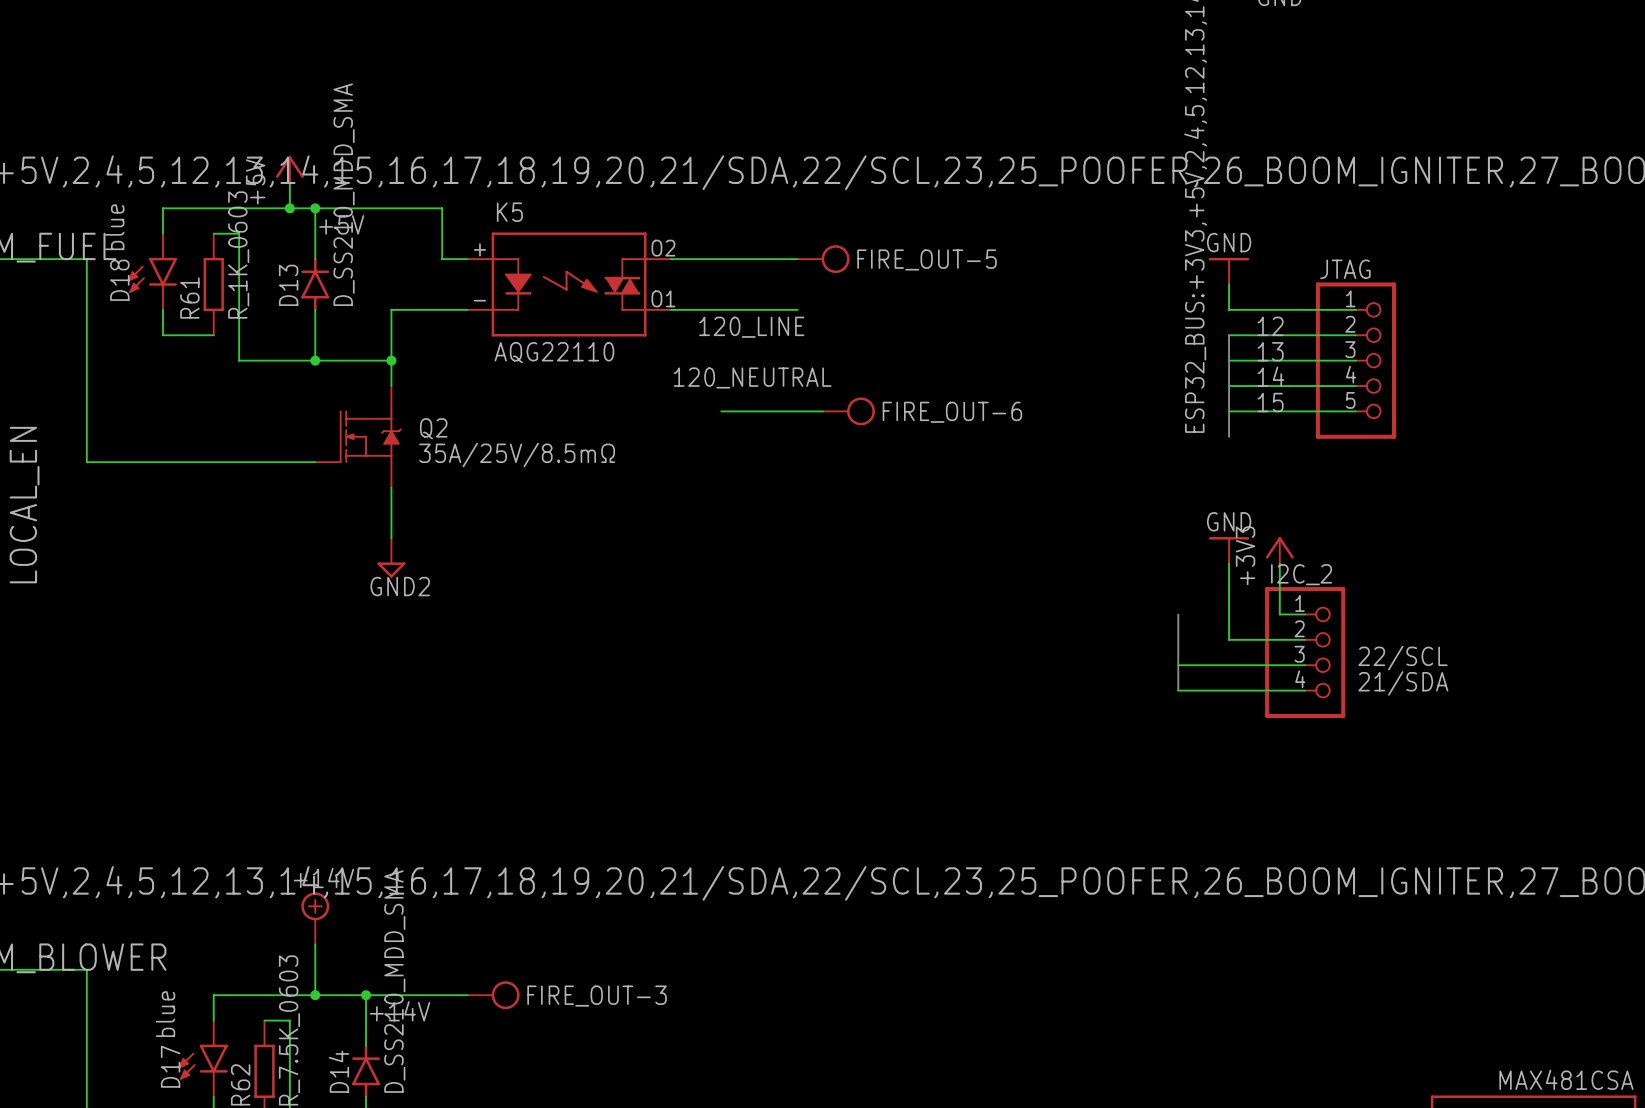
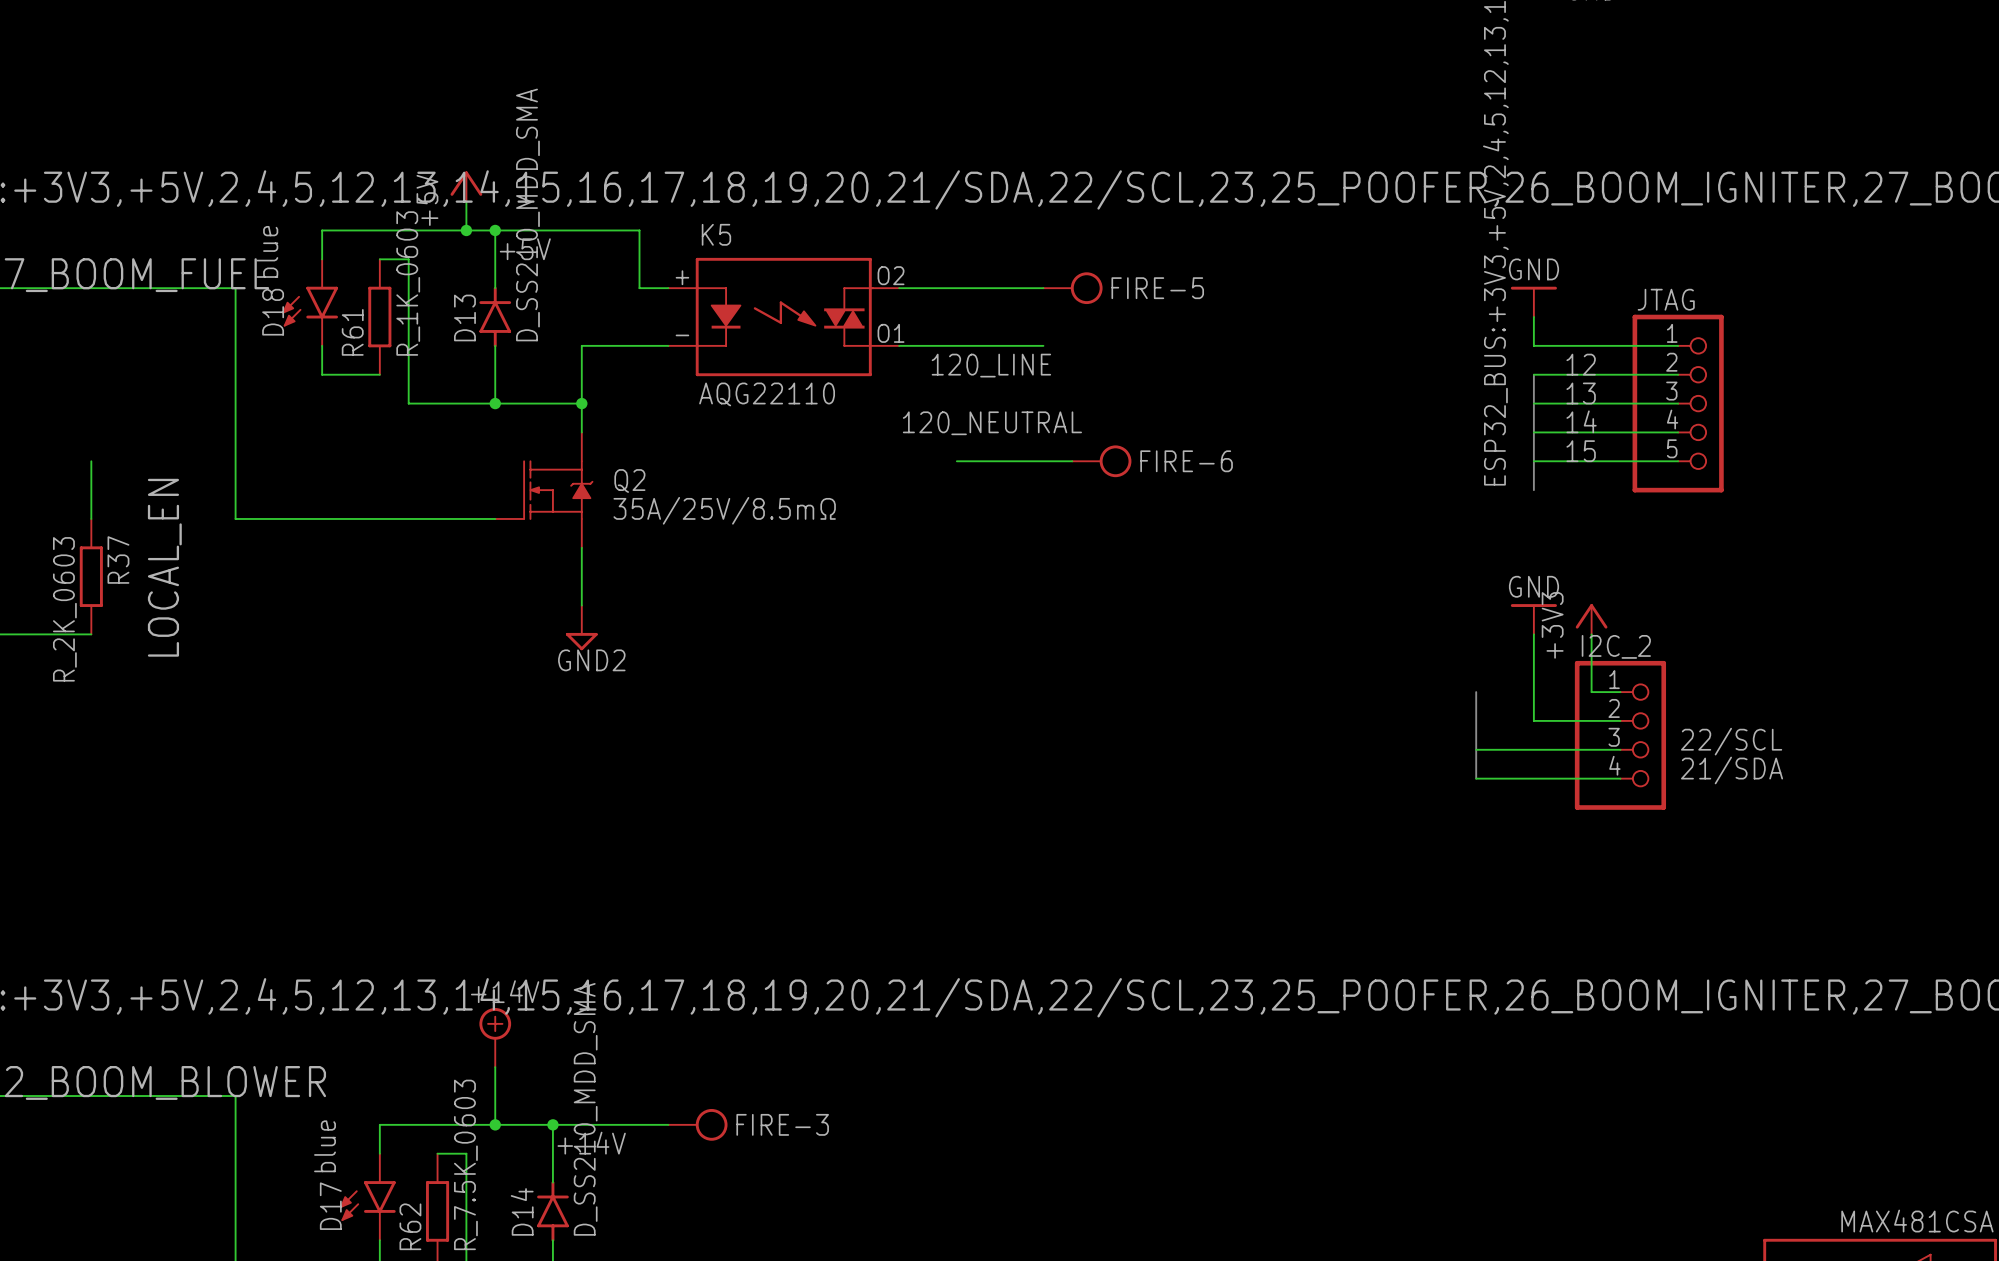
FIRE_OUT-5 name: FIRE_OUT-5 (927, 259) -> FIRE-5 (1157, 288)
FIRE_OUT-6 name: FIRE_OUT-6 (952, 412) -> FIRE-6 (1186, 461)
FIRE_OUT-3 name: FIRE_OUT-3 (597, 996) -> FIRE-3 (782, 1124)

